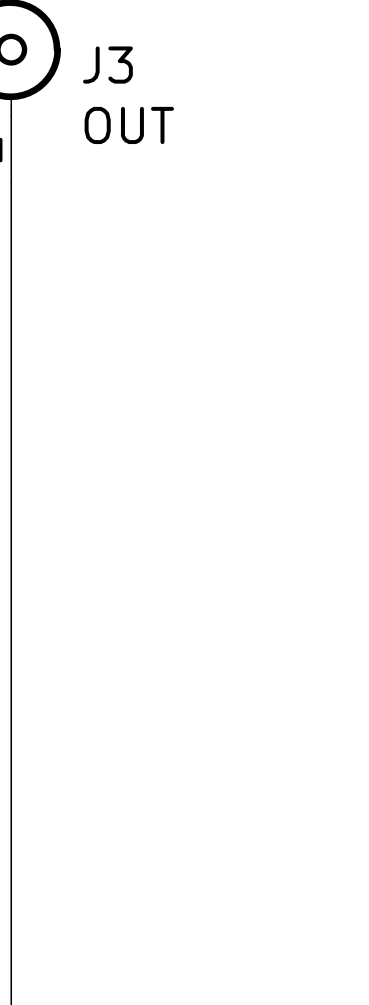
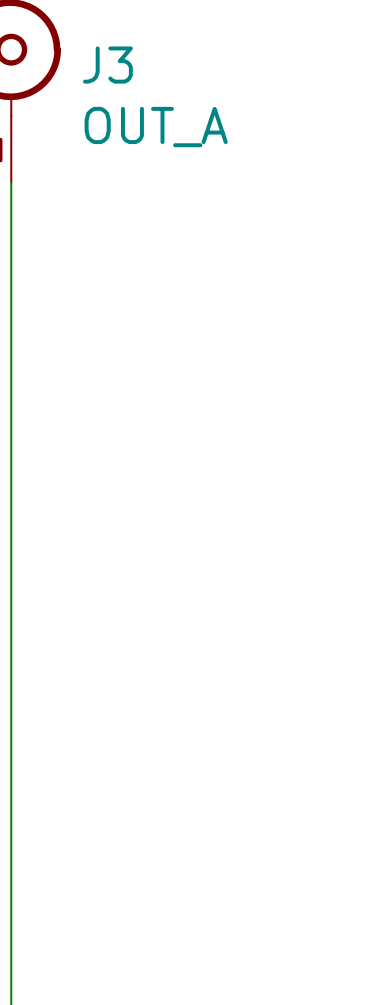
J3 value: OUT (129, 125) -> OUT_A (156, 127)

